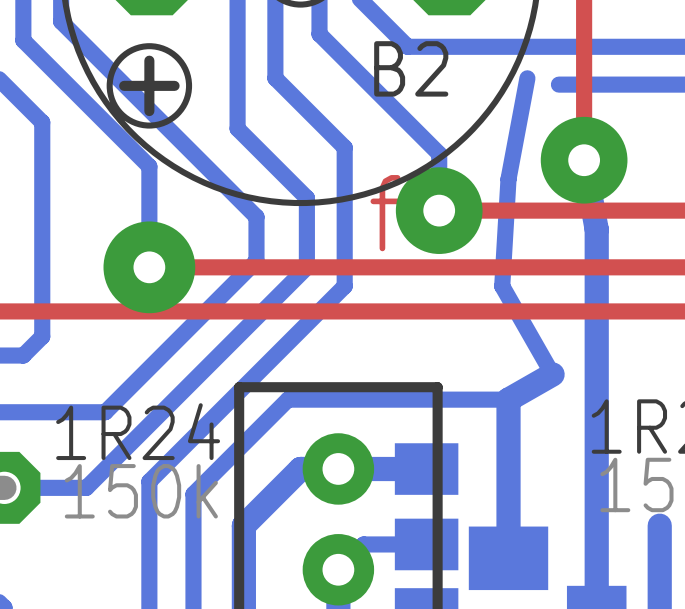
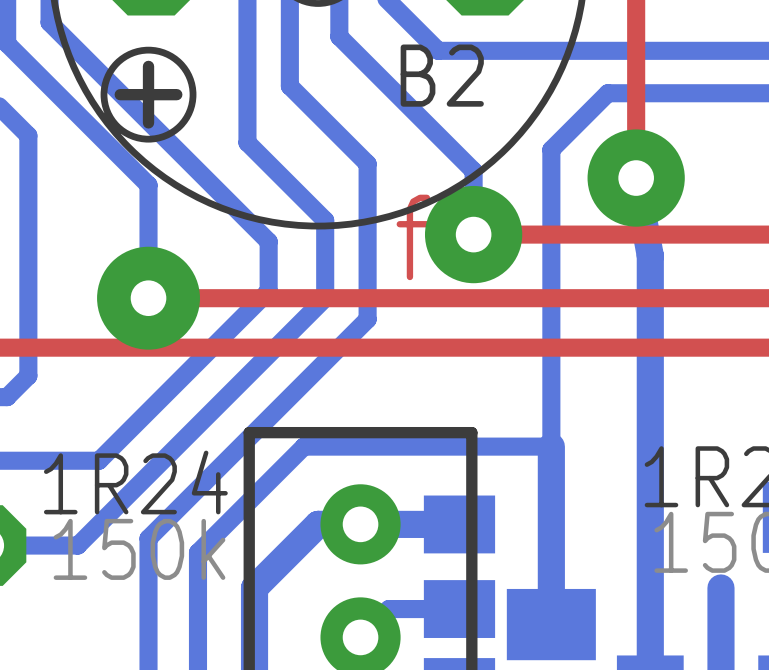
bottom track: (527, 78) (508, 179) (502, 286) (552, 374) (508, 399) -> (607, 93) (551, 149) (551, 446)

